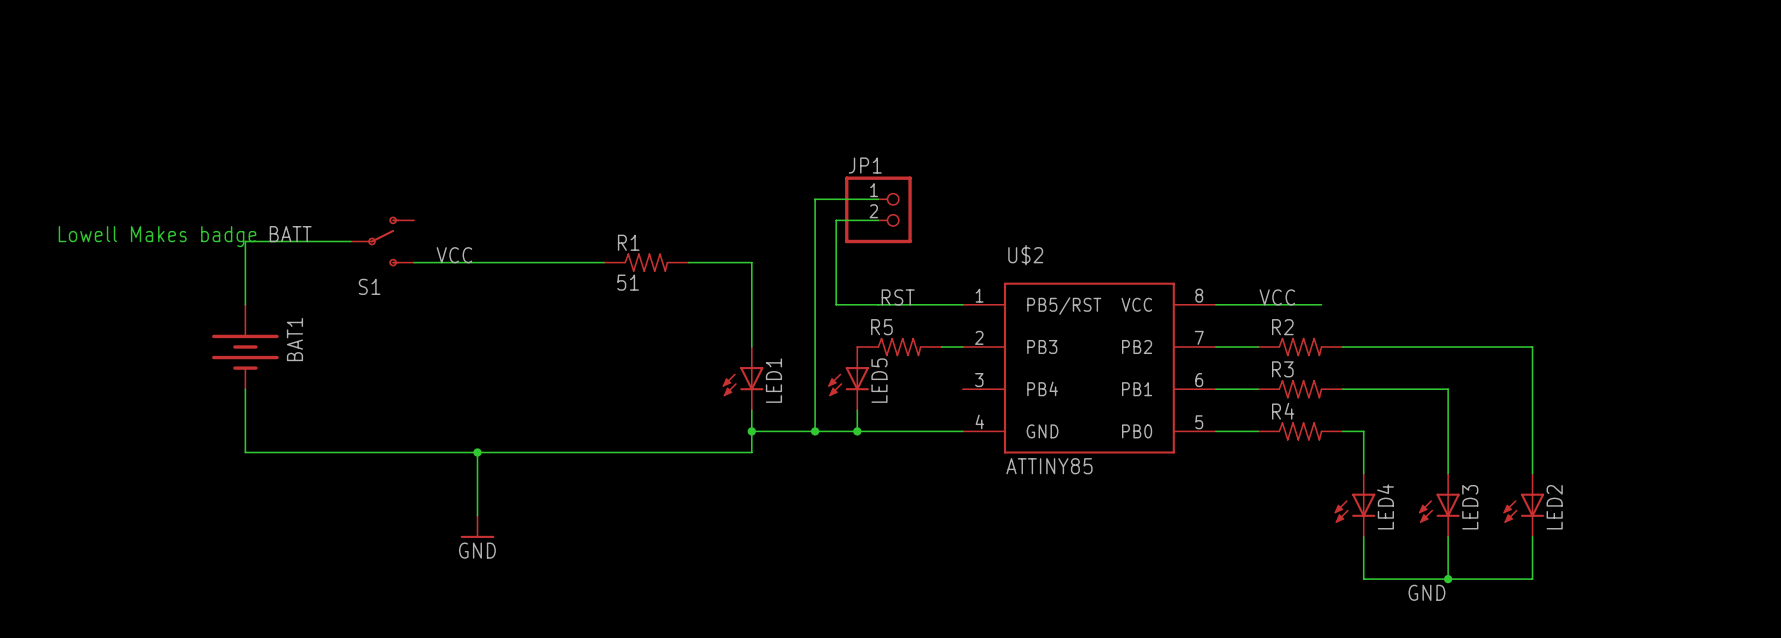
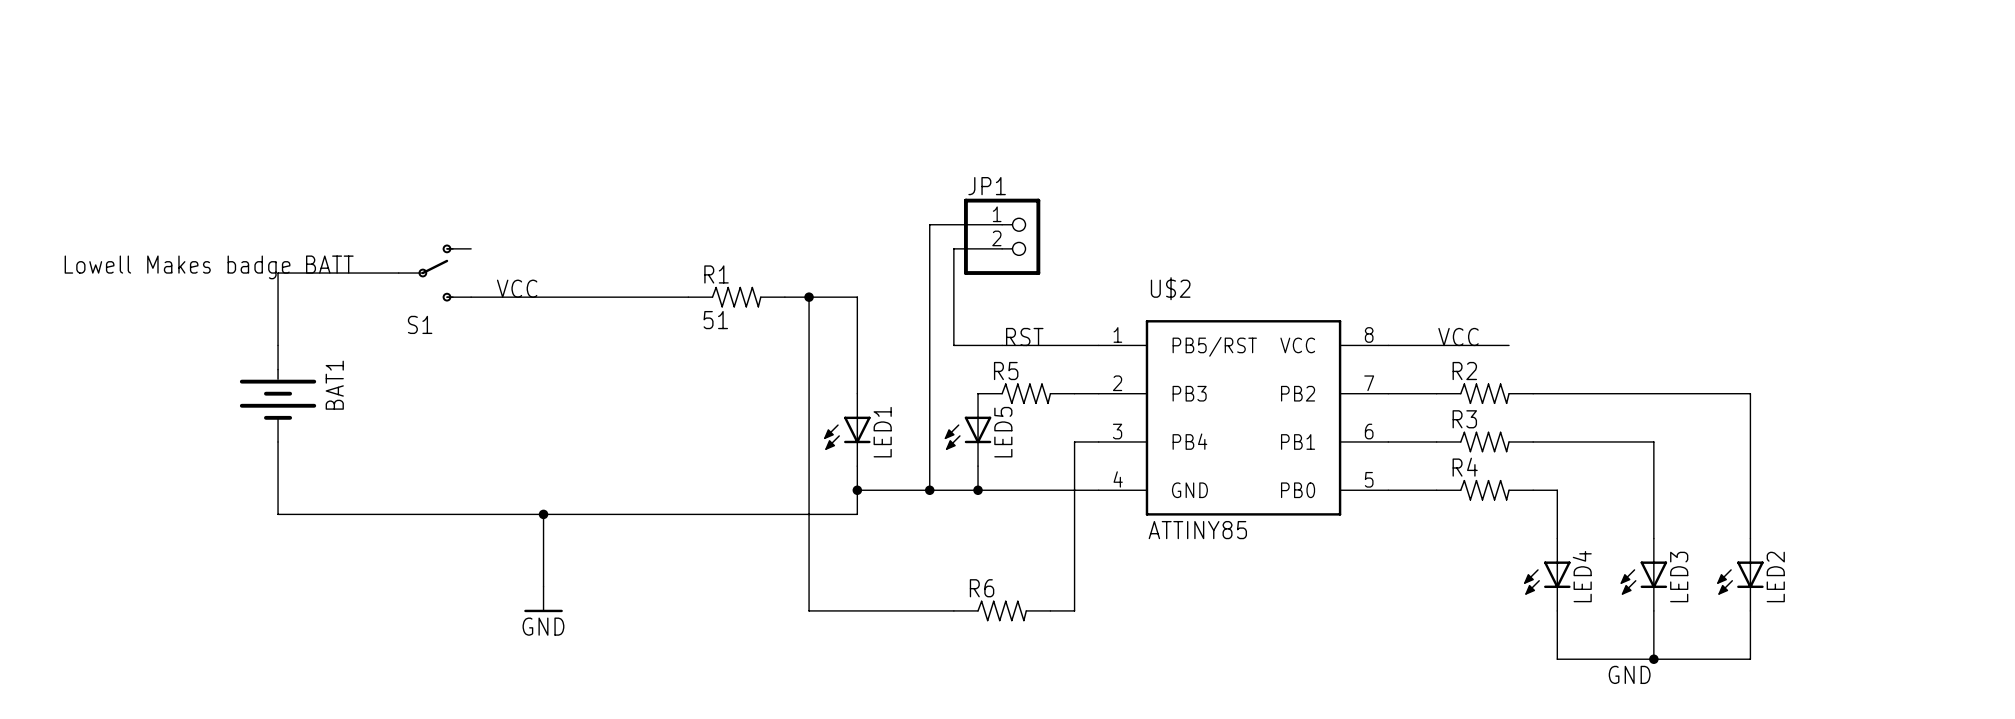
wire: none -> (809, 297) (809, 610) (953, 610)
junction: none -> (809, 297)
wire: none -> (1098, 441) (1074, 441) (1074, 610) (1050, 610)
R6: none -> (1002, 610)

